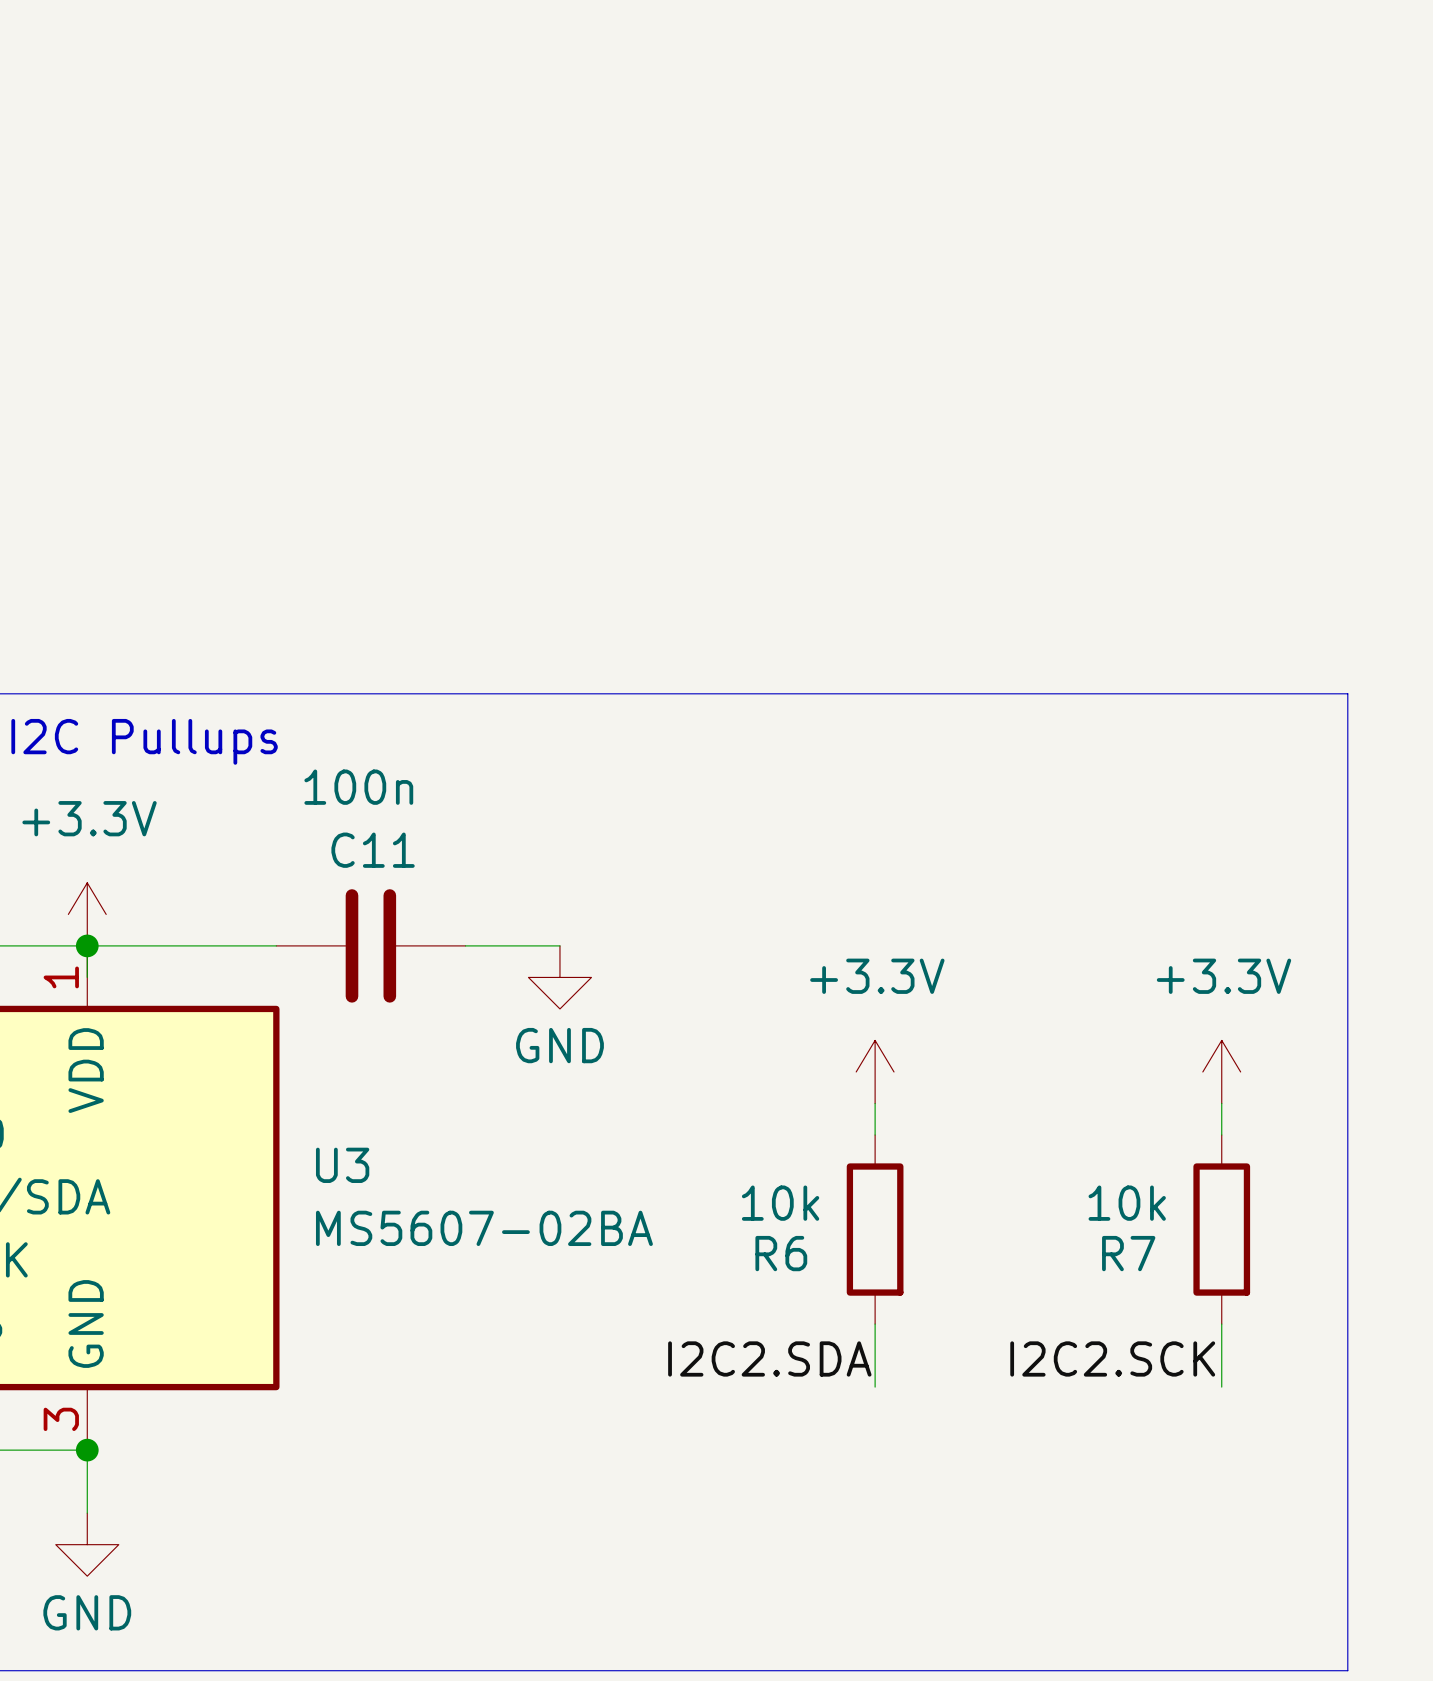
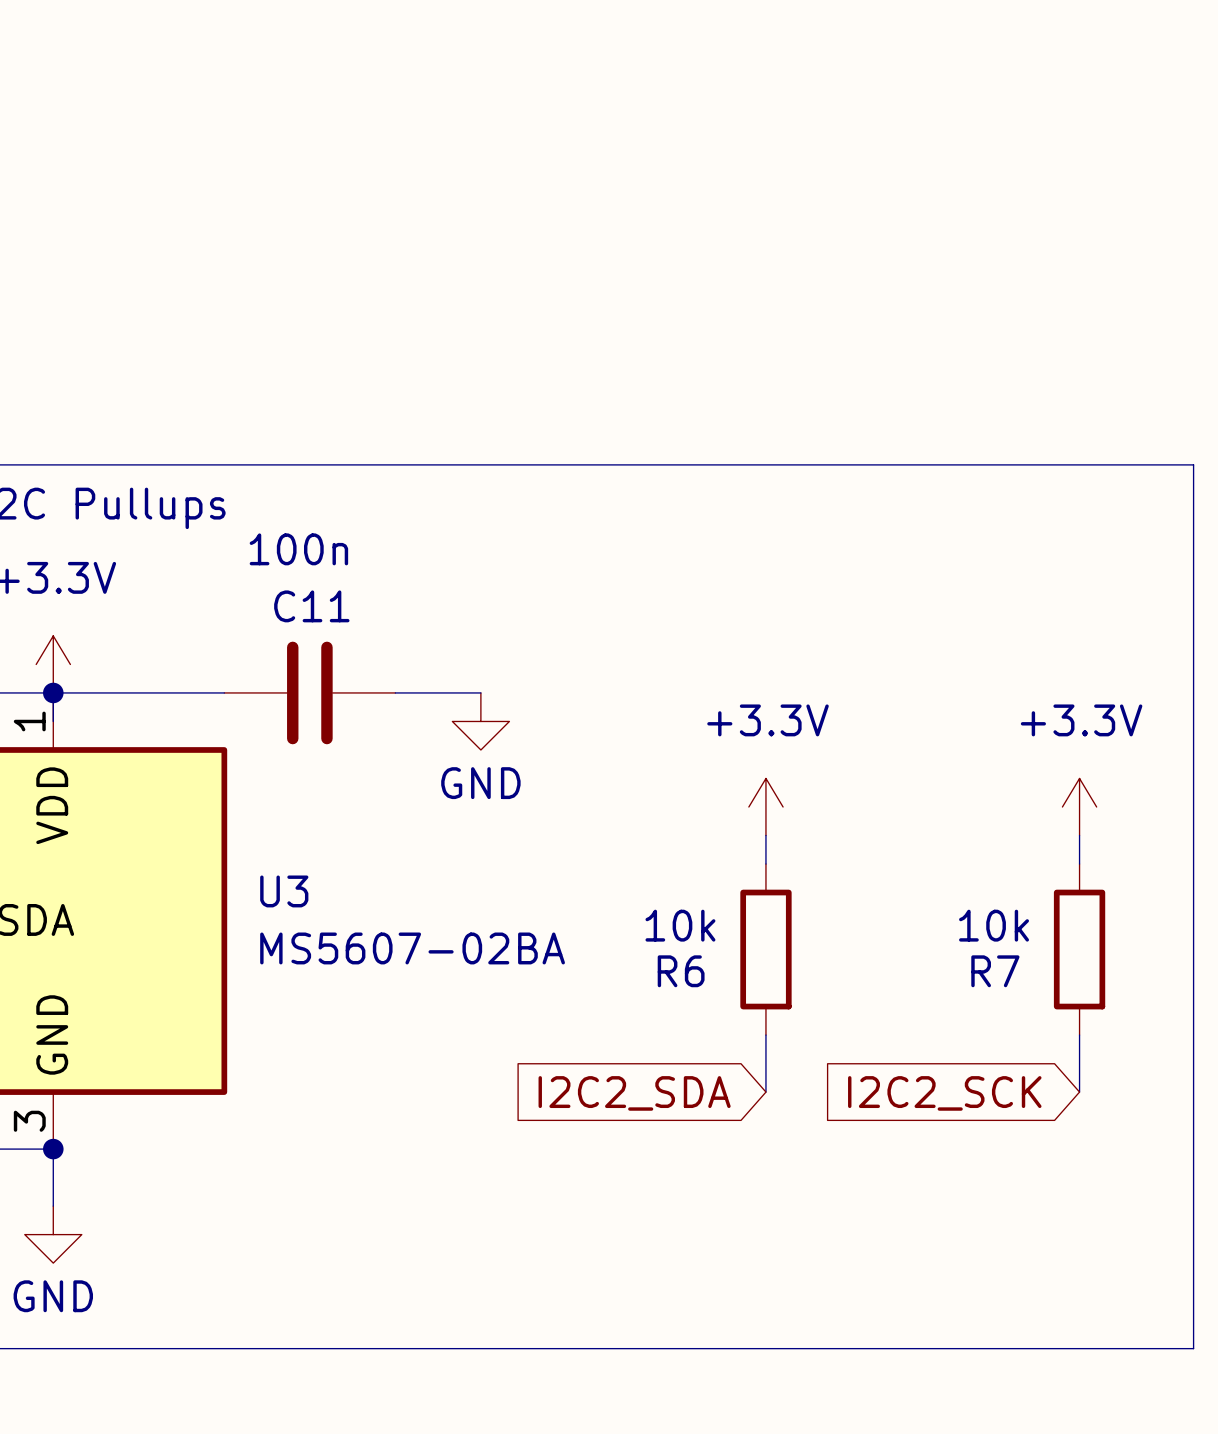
label: I2C2.SDA (769, 1358) -> none
label: I2C2.SCK (1112, 1358) -> none
global label: none -> I2C2_SDA (634, 1093)
global label: none -> I2C2_SCK (944, 1093)

